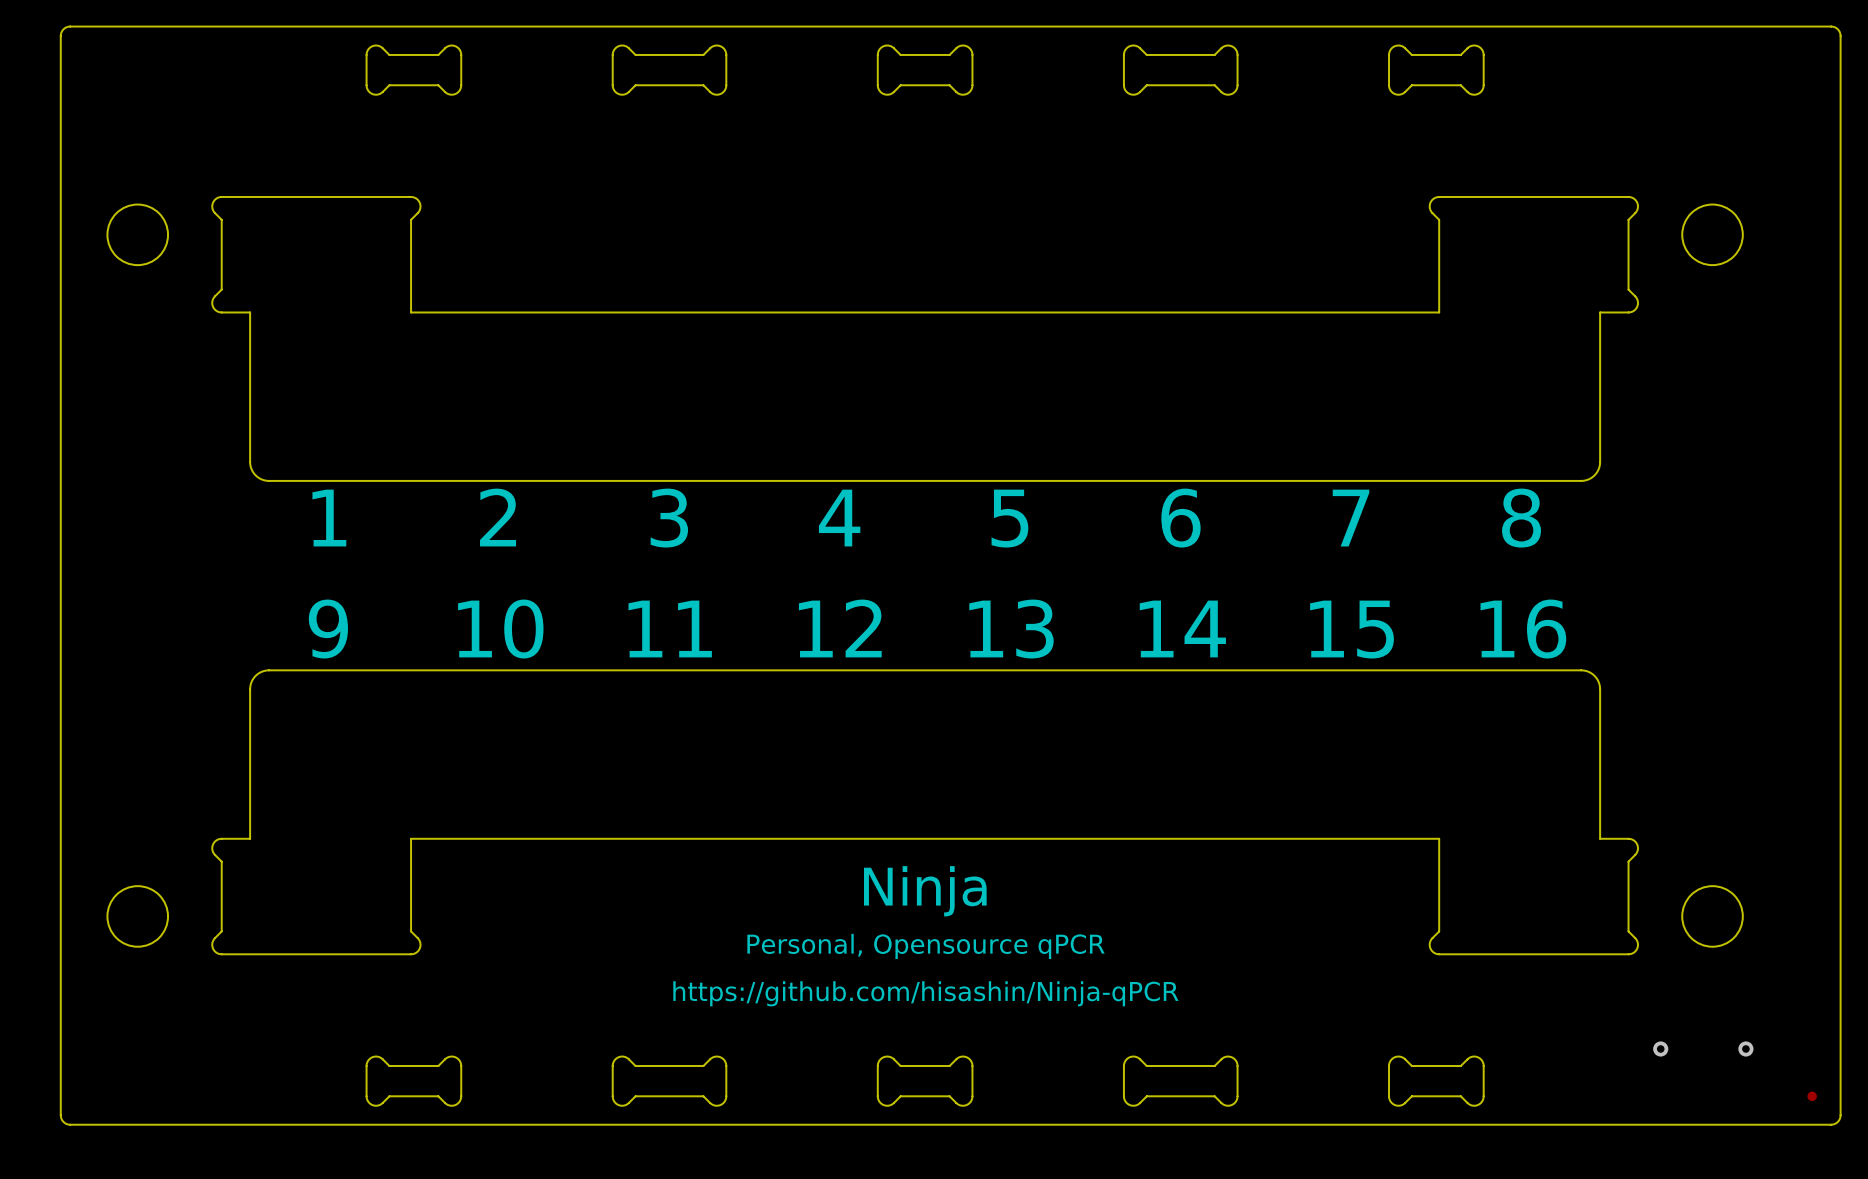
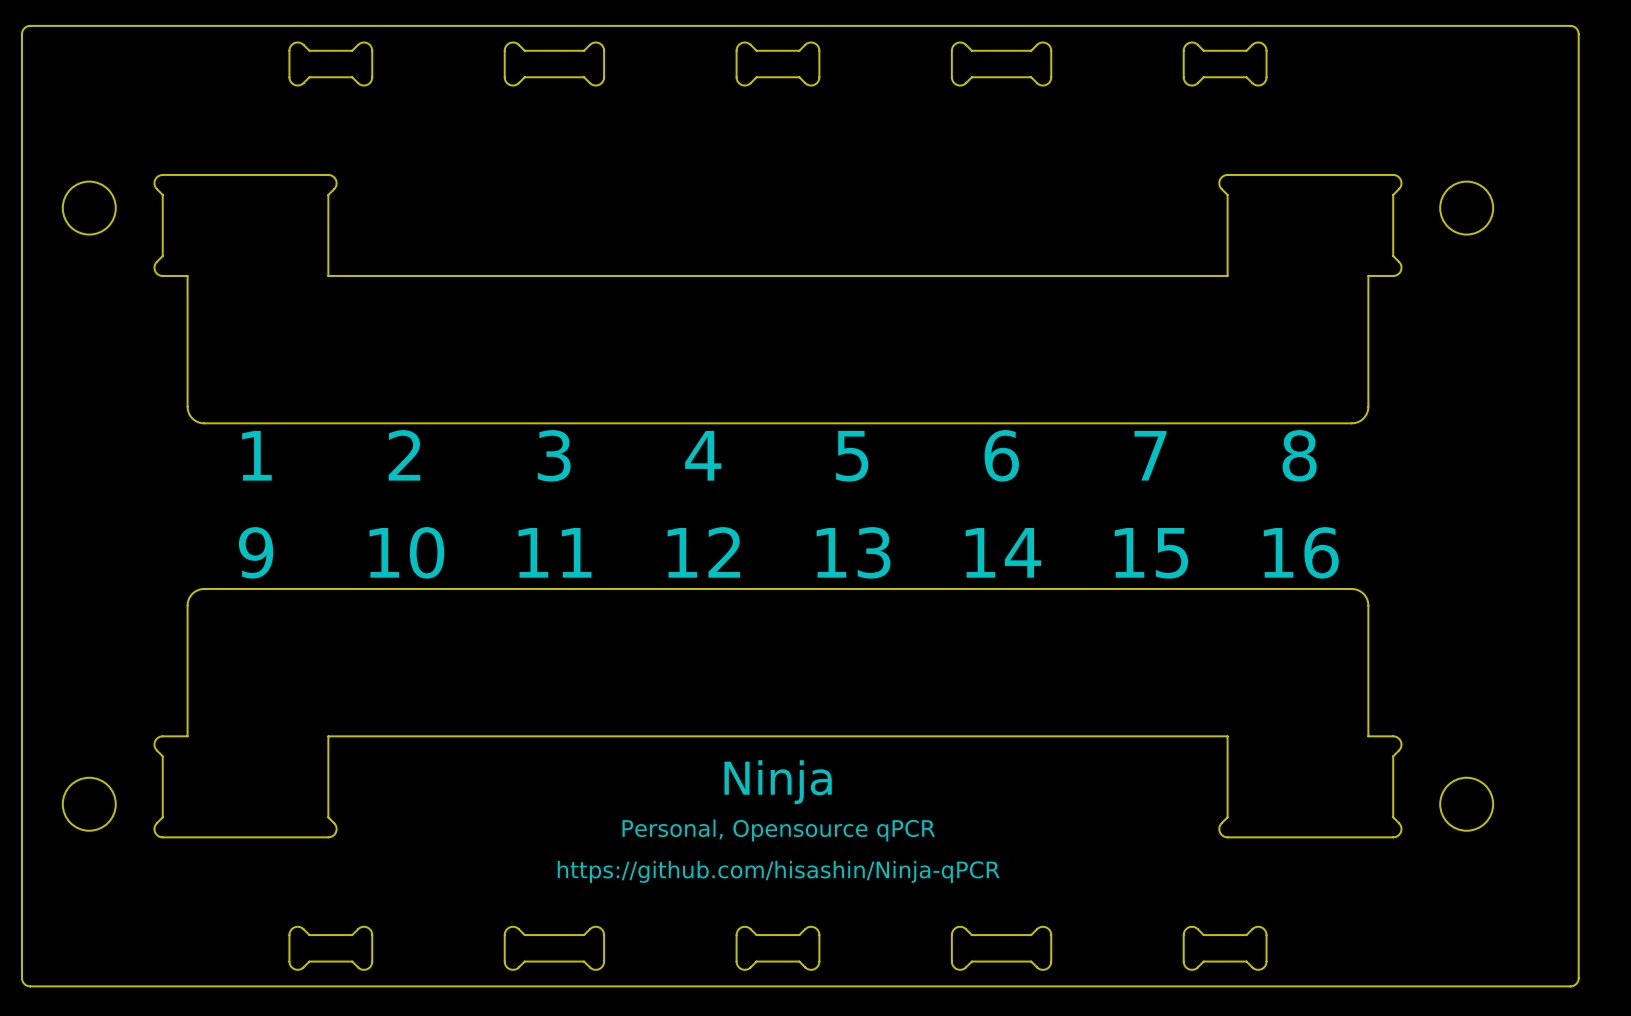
via: (1660, 1048) -> none
via: (1745, 1048) -> none
part: (1812, 1096) -> none

